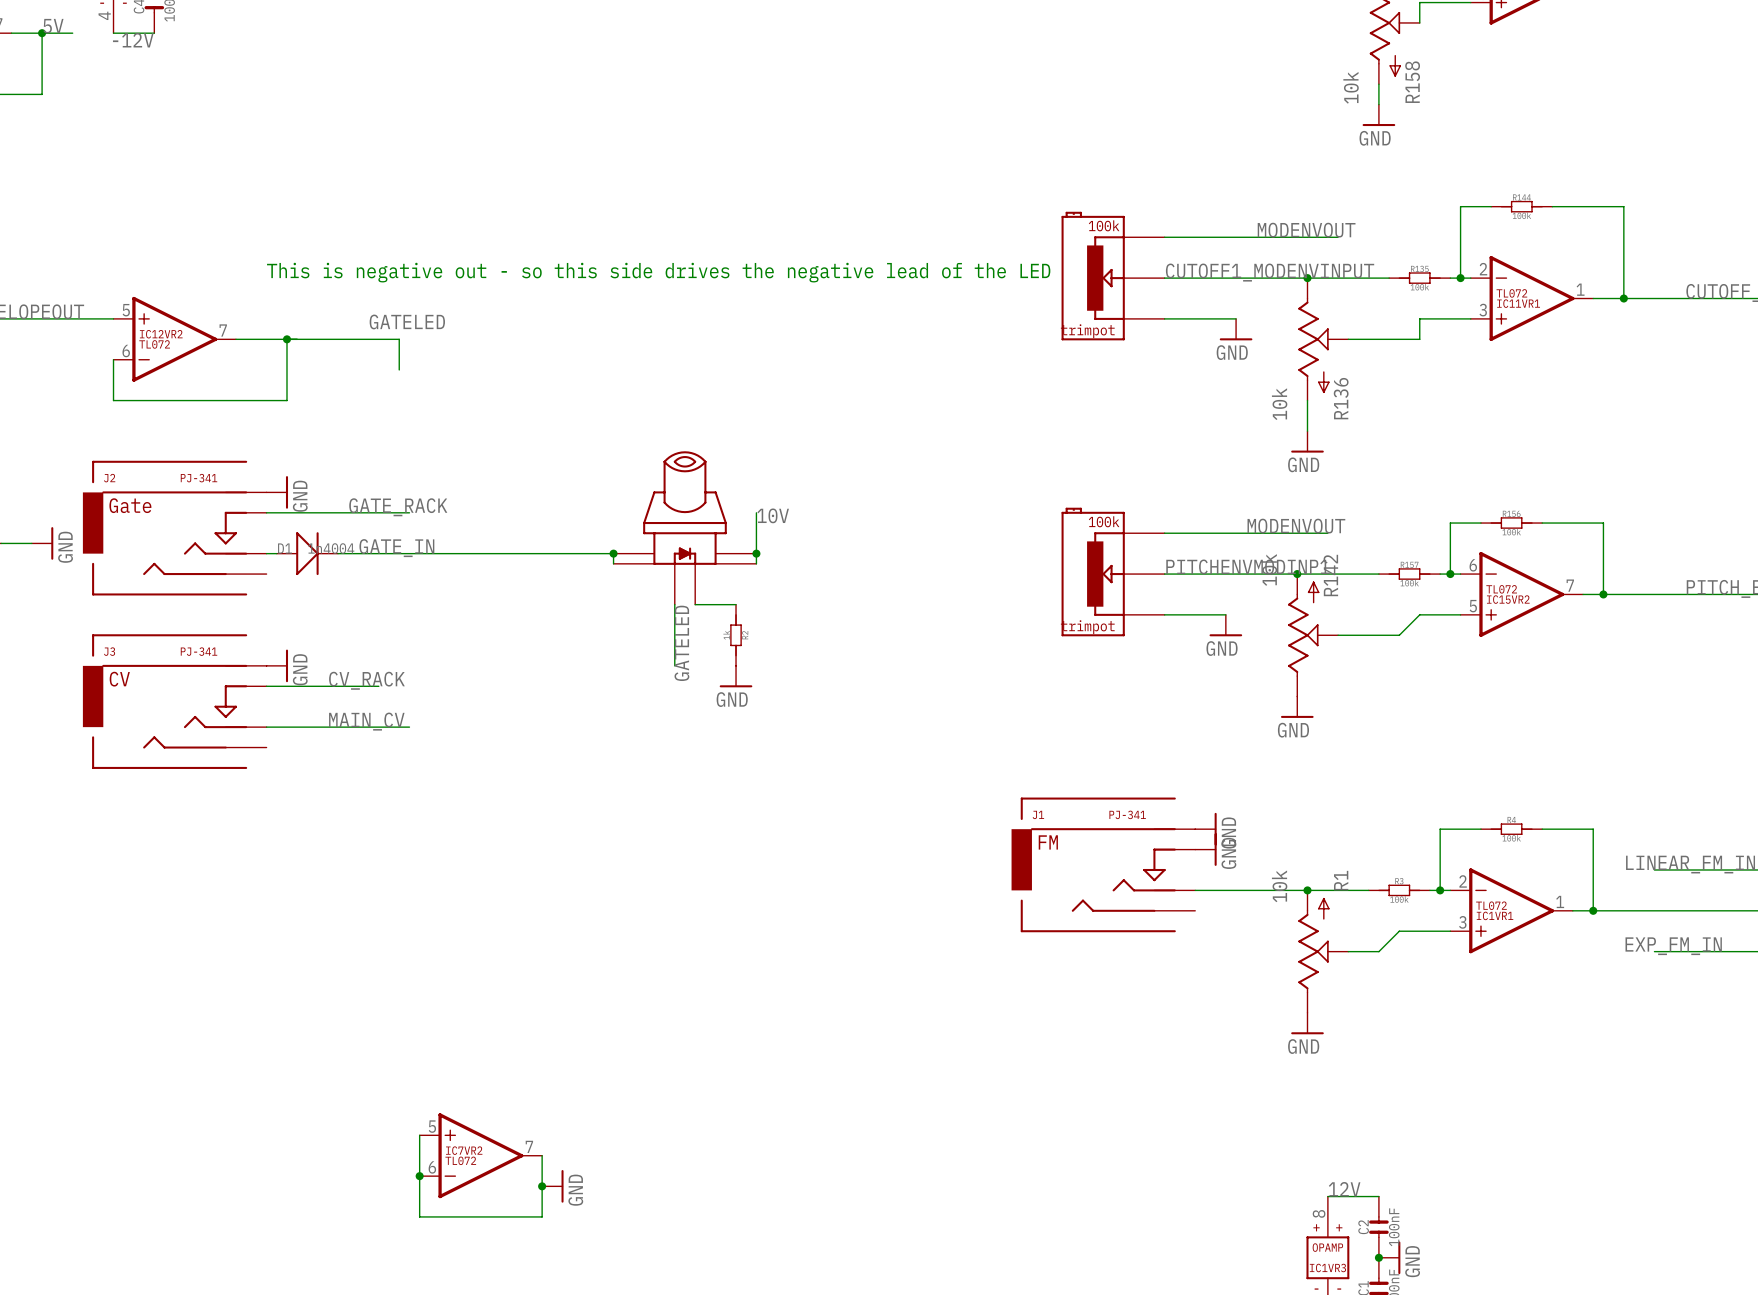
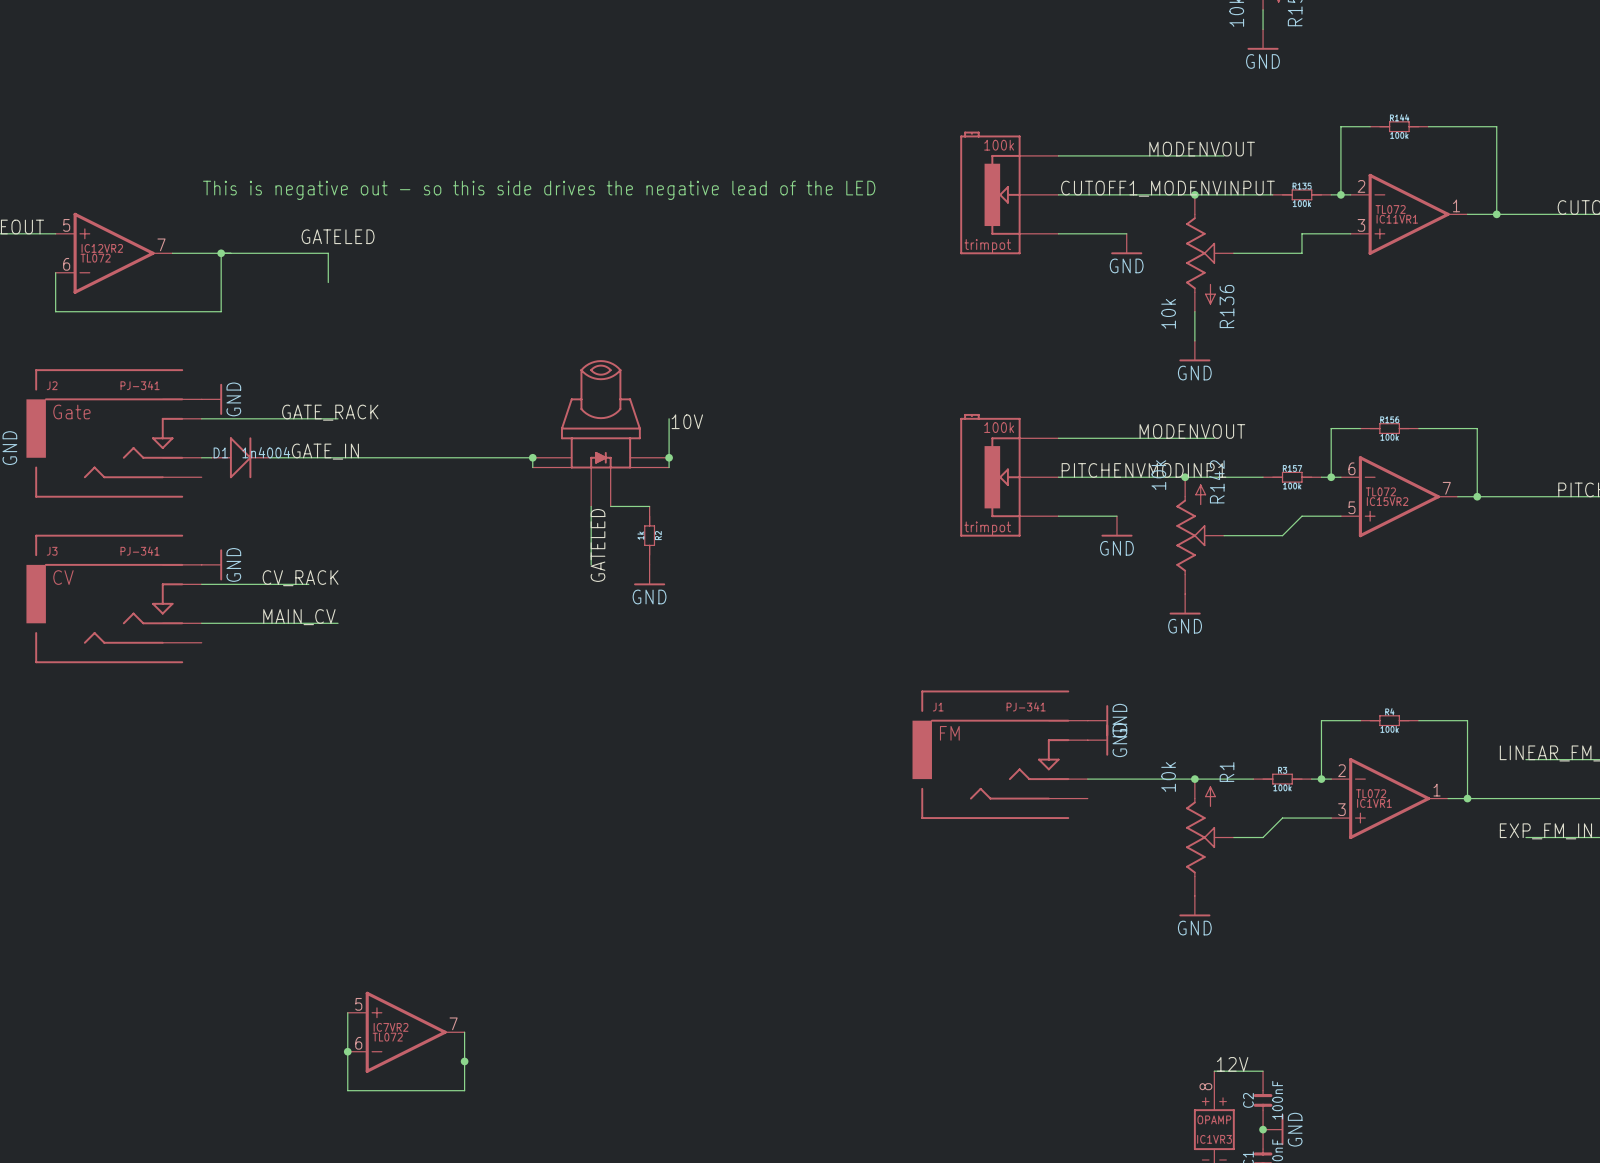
power symbol: GND (552, 1186) -> none

